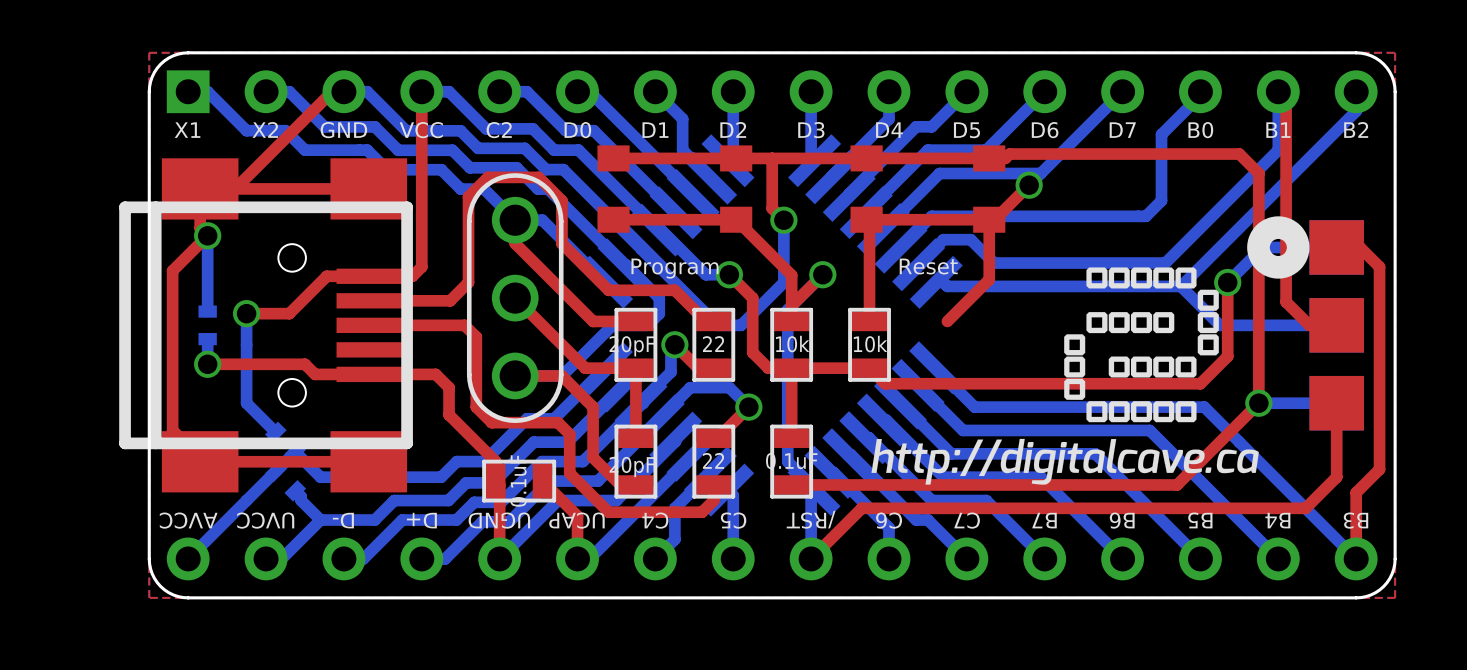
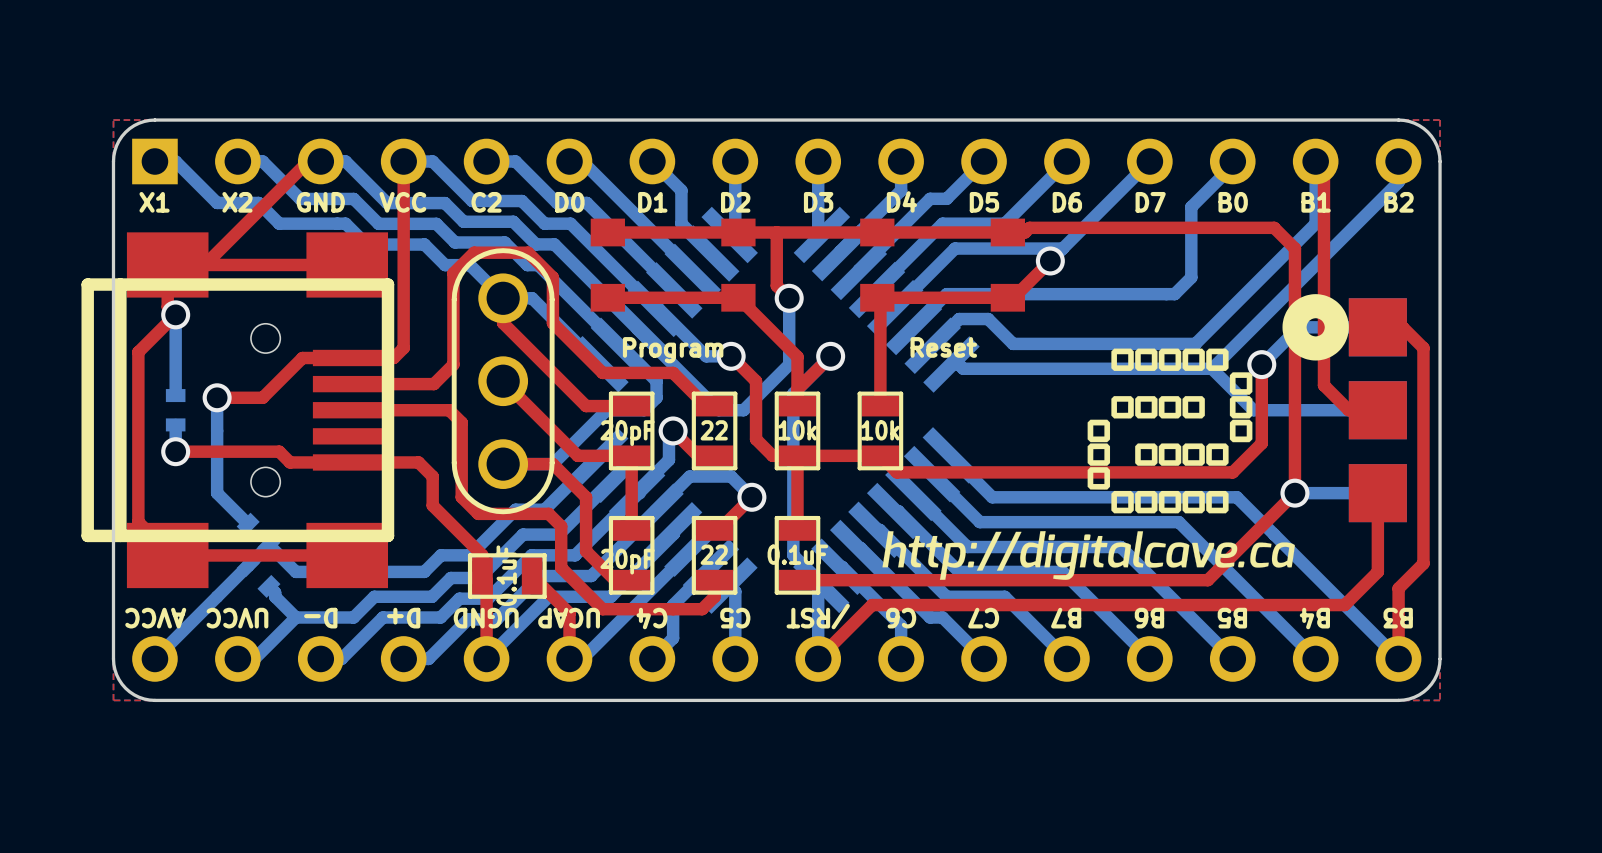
top track: (989, 219) (989, 279) (947, 321) -> none

